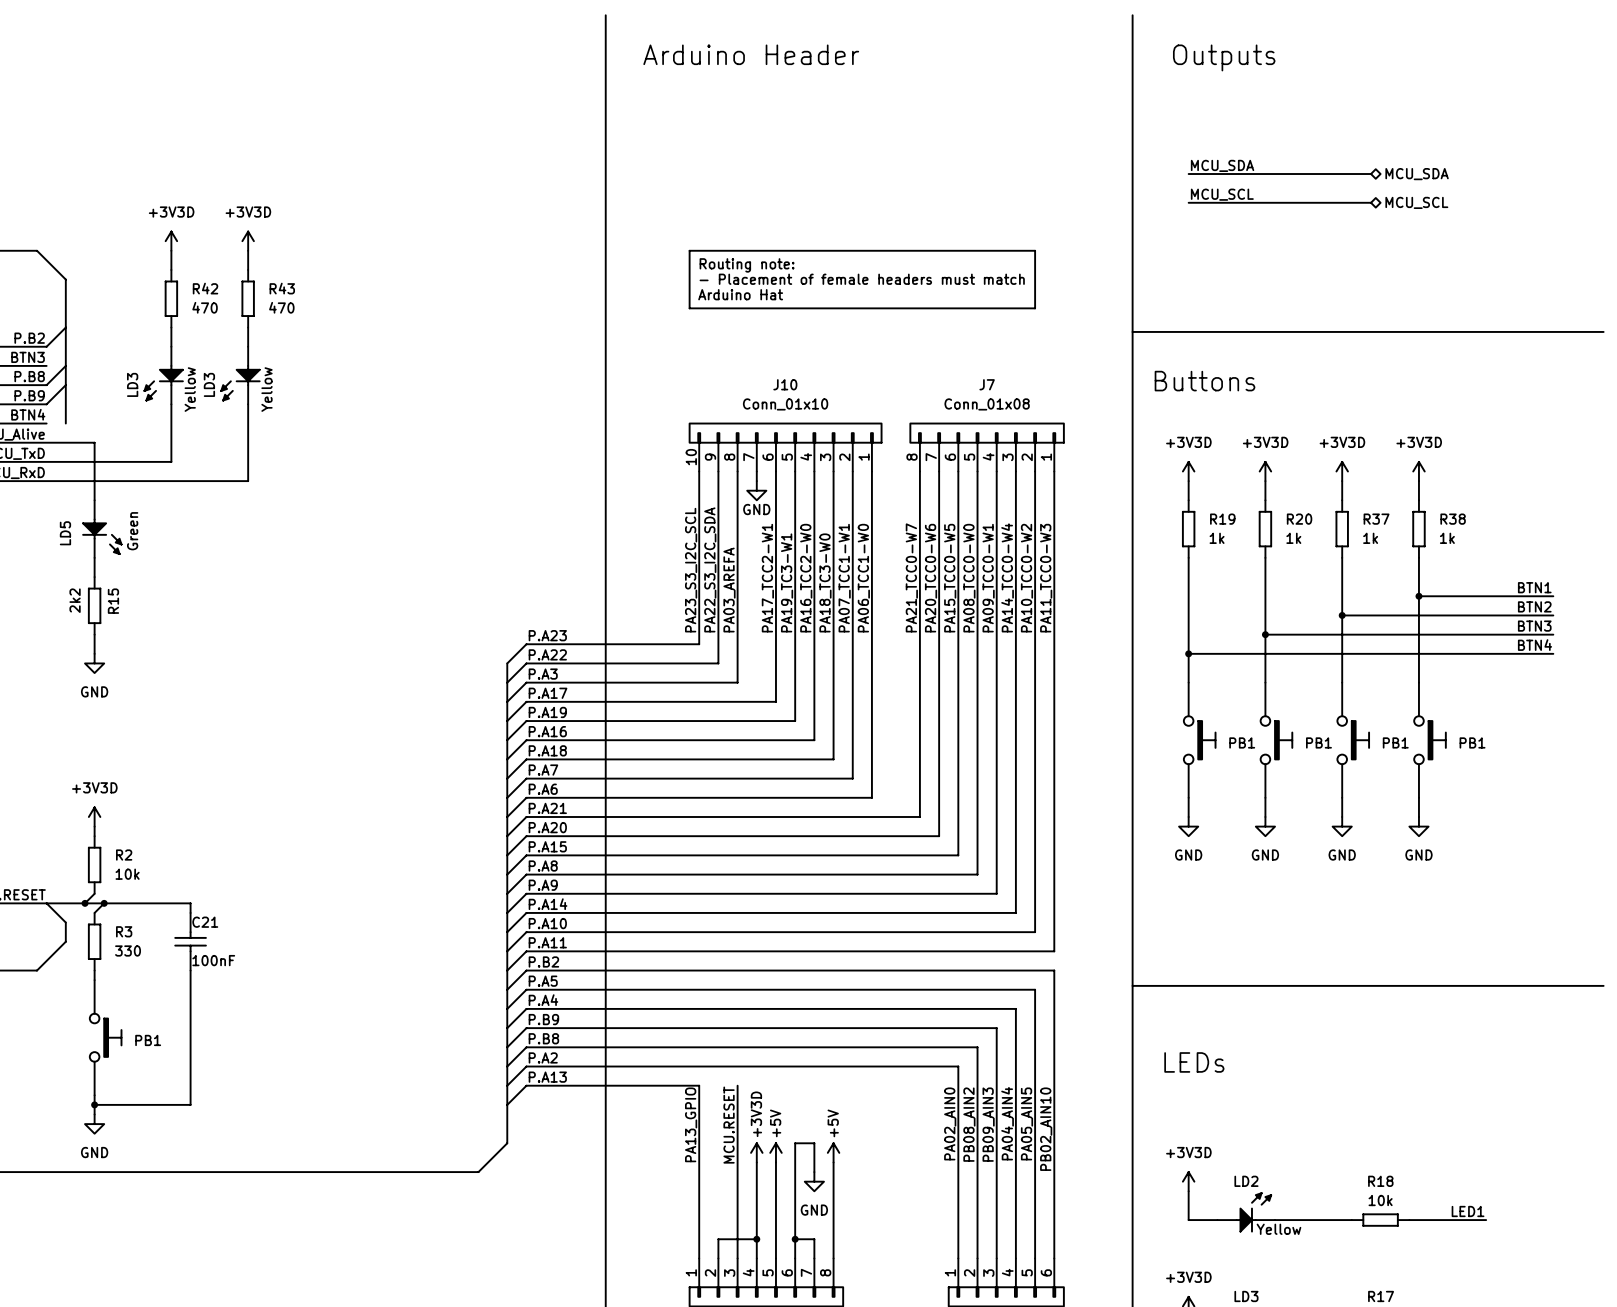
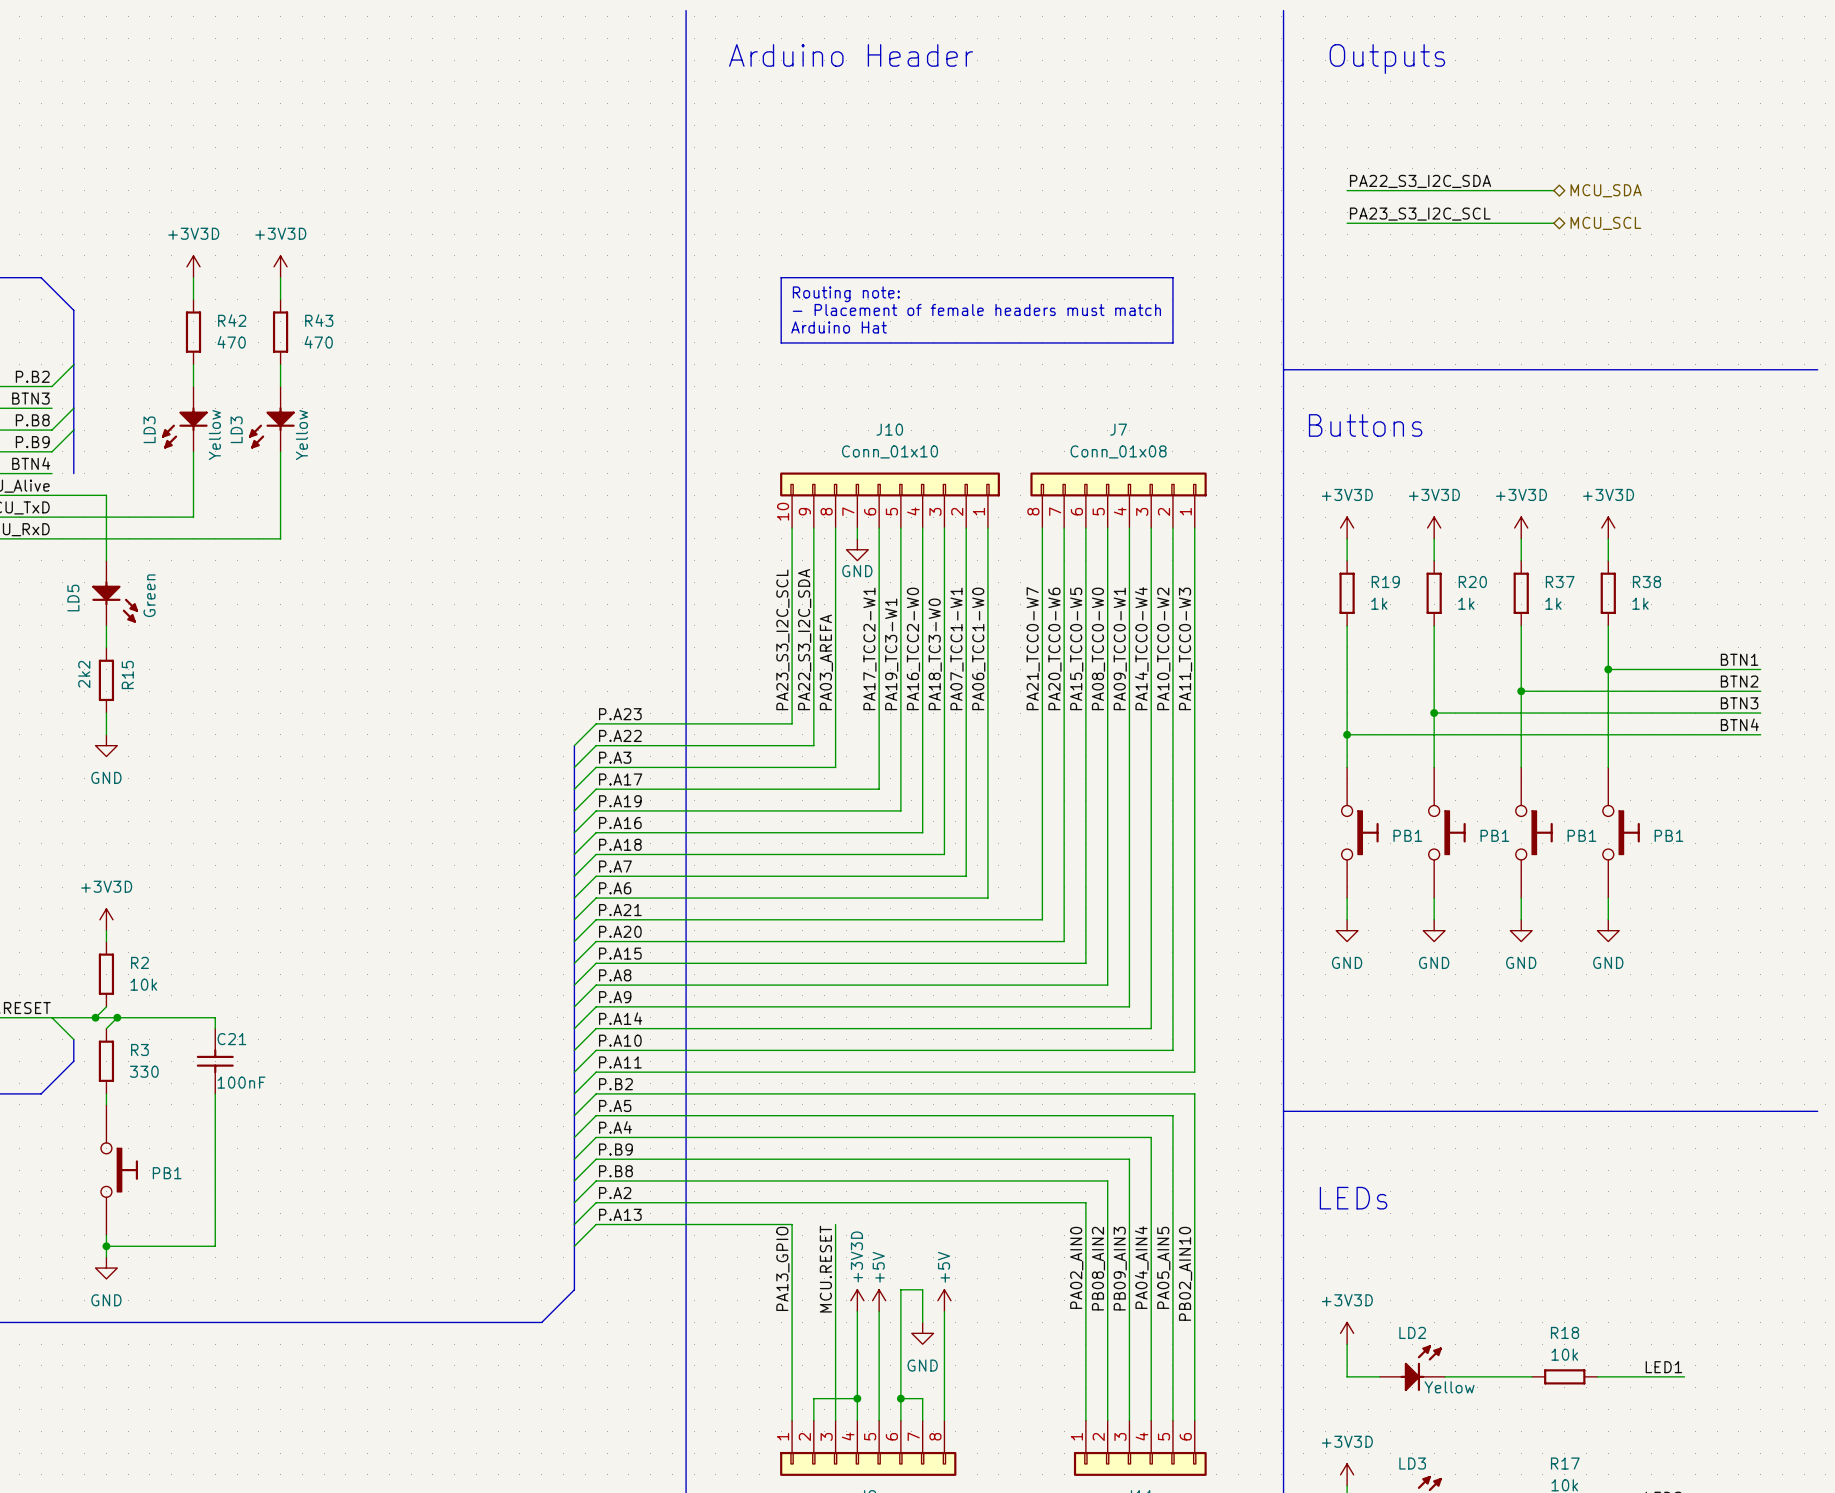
label: MCU_SDA (1222, 165) -> PA22_S3_I2C_SDA (1420, 181)
label: MCU_SCL (1222, 194) -> PA23_S3_I2C_SCL (1420, 214)

